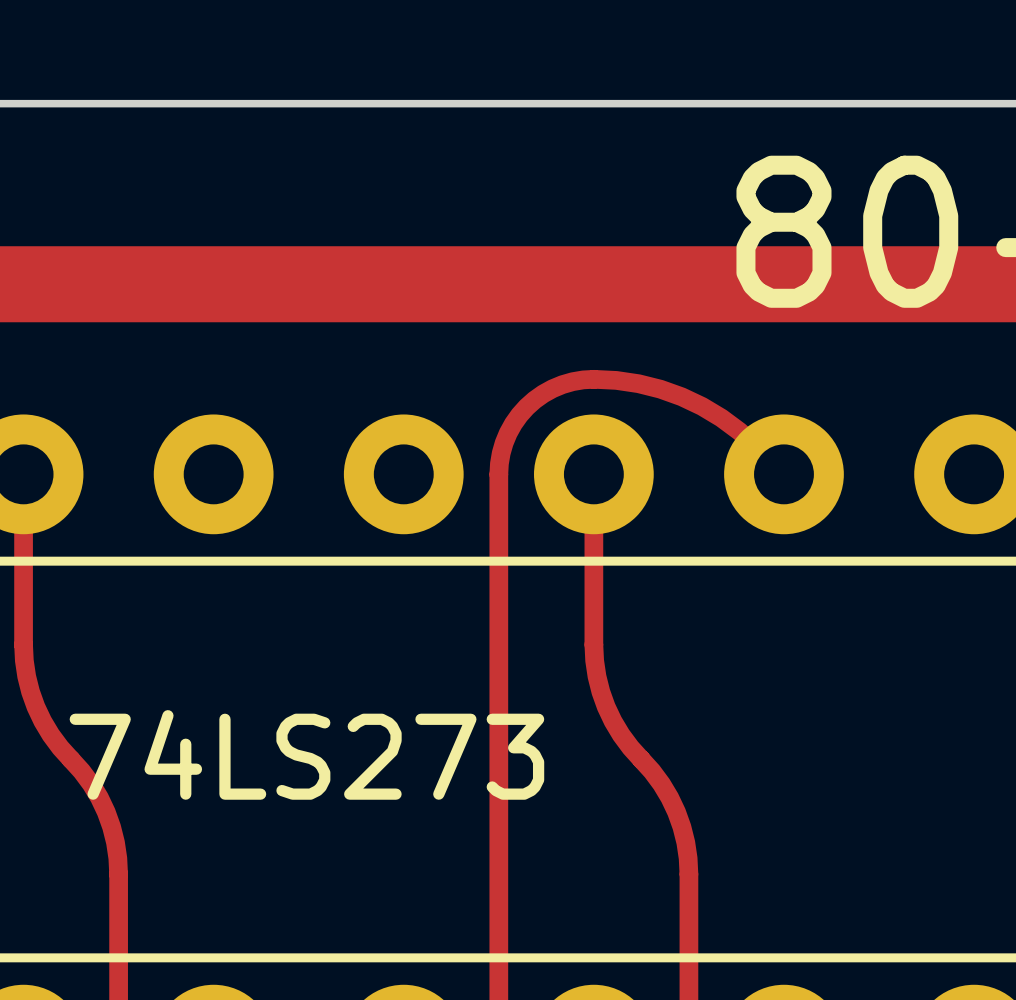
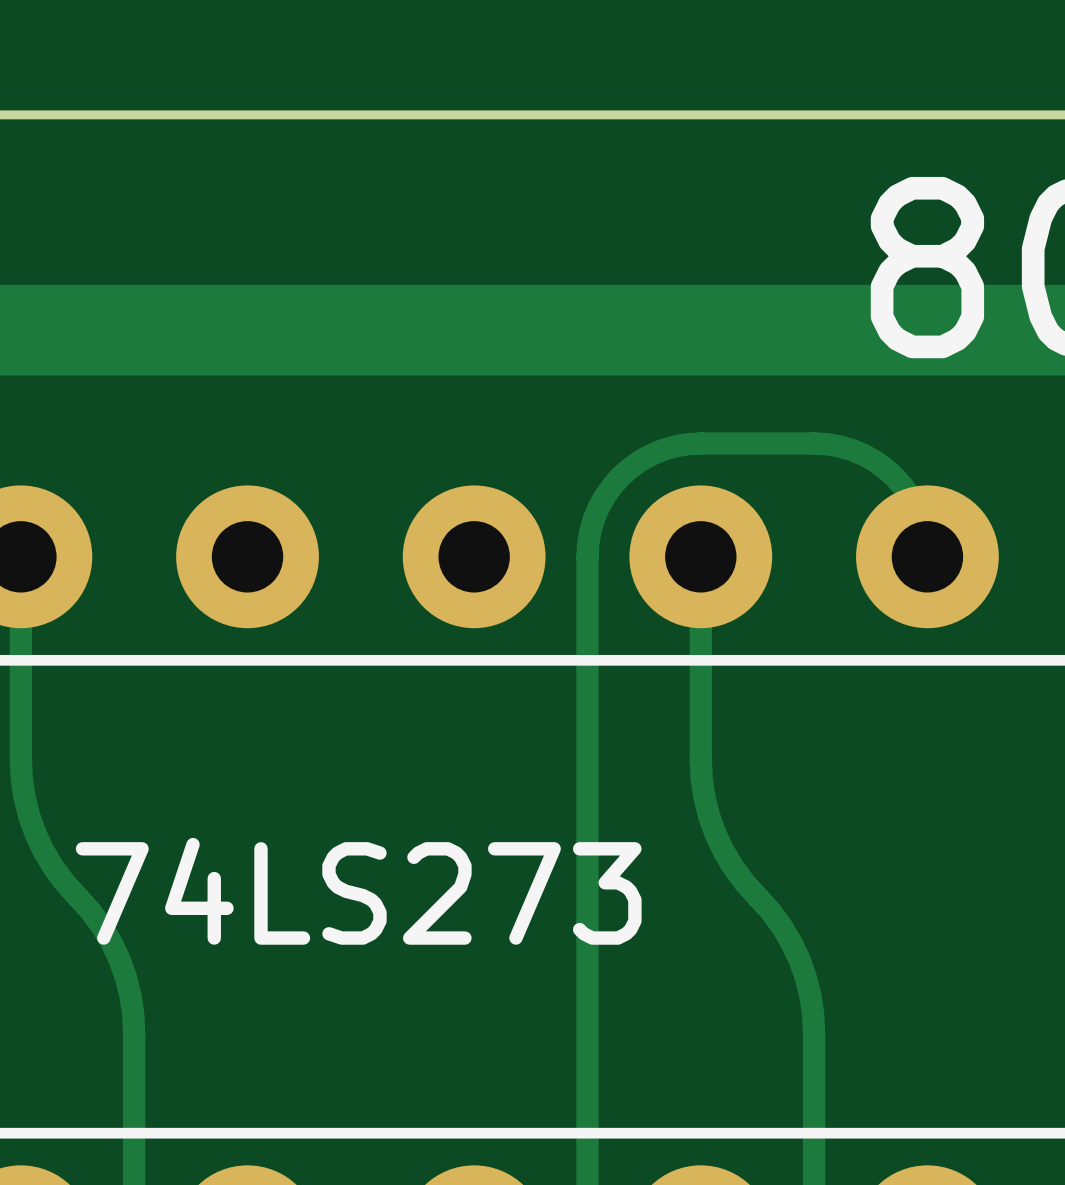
track: (593, 379) (638, 383) (681, 396) (721, 417) (756, 446) -> (700, 443) (826, 444) (863, 454) (894, 476) (910, 496) (921, 519) (927, 556)

